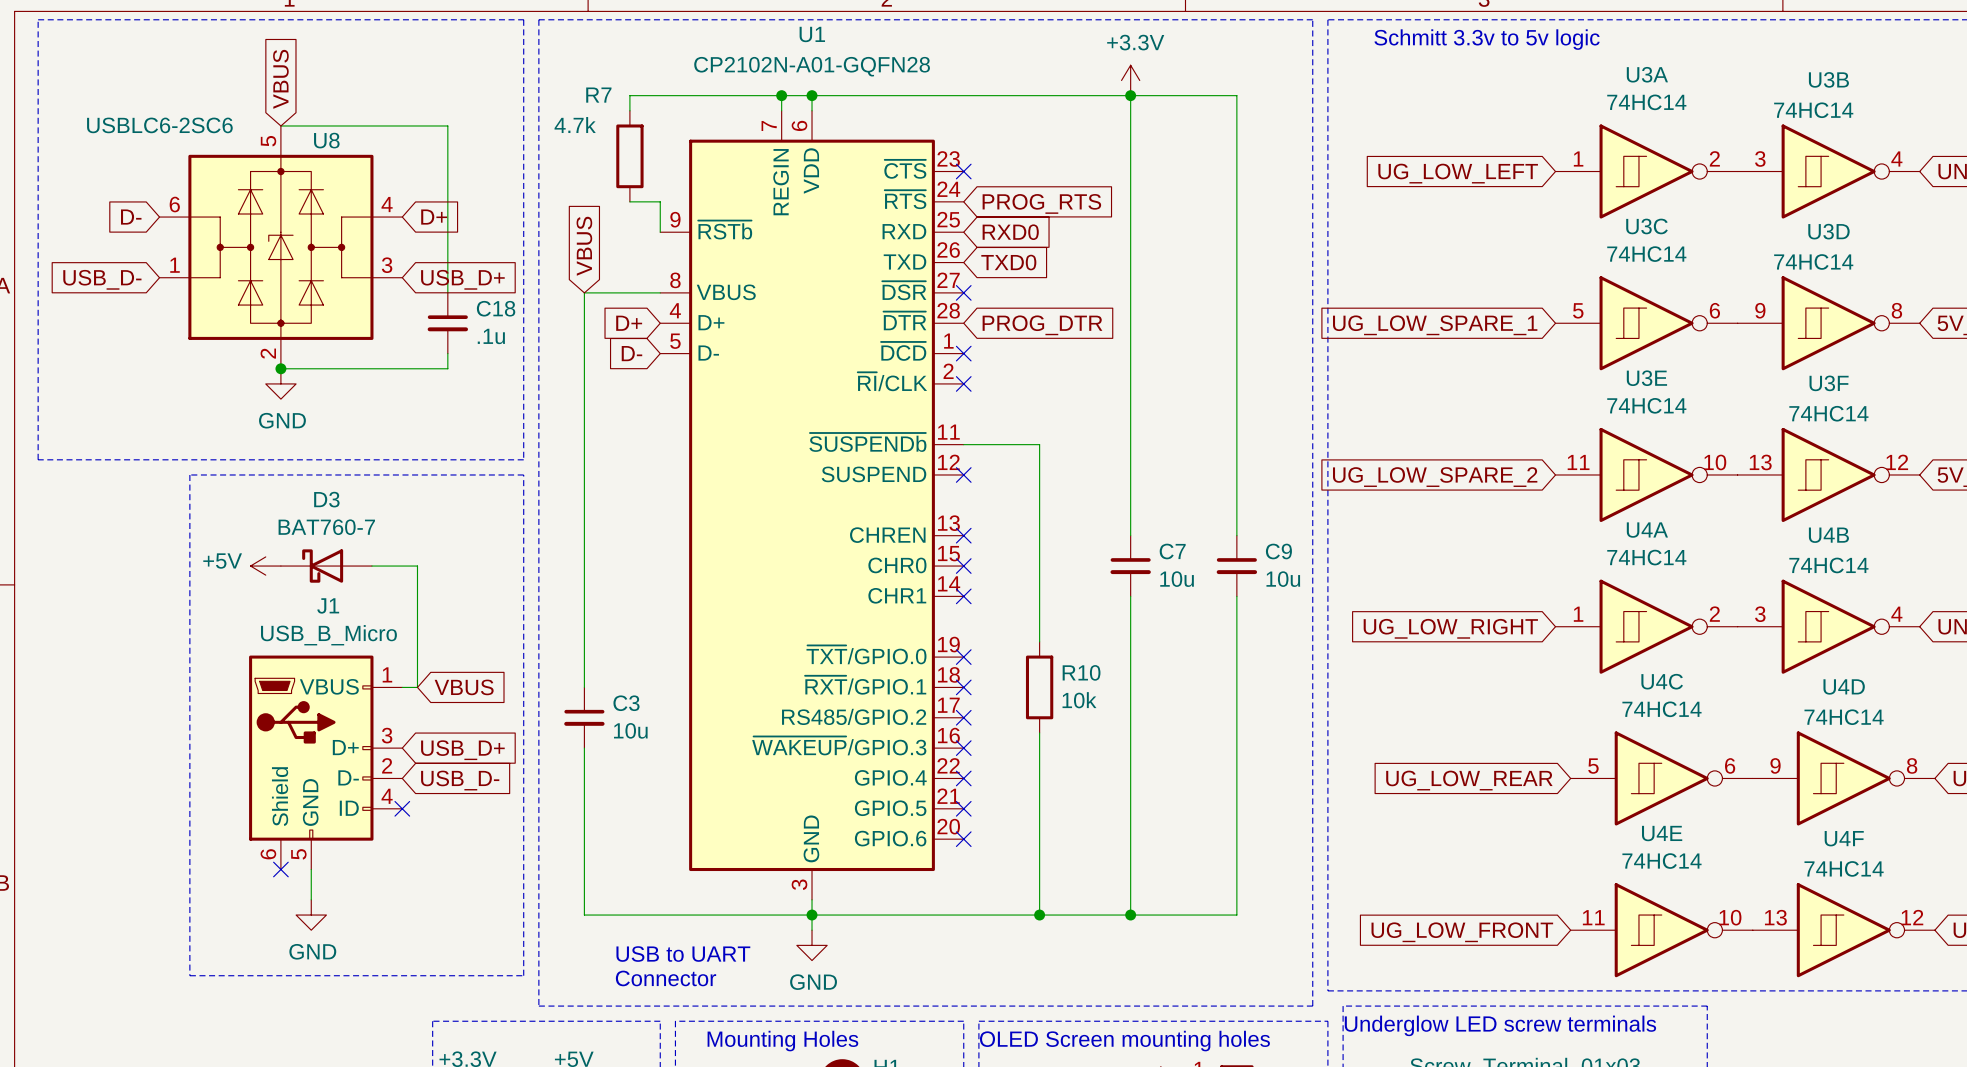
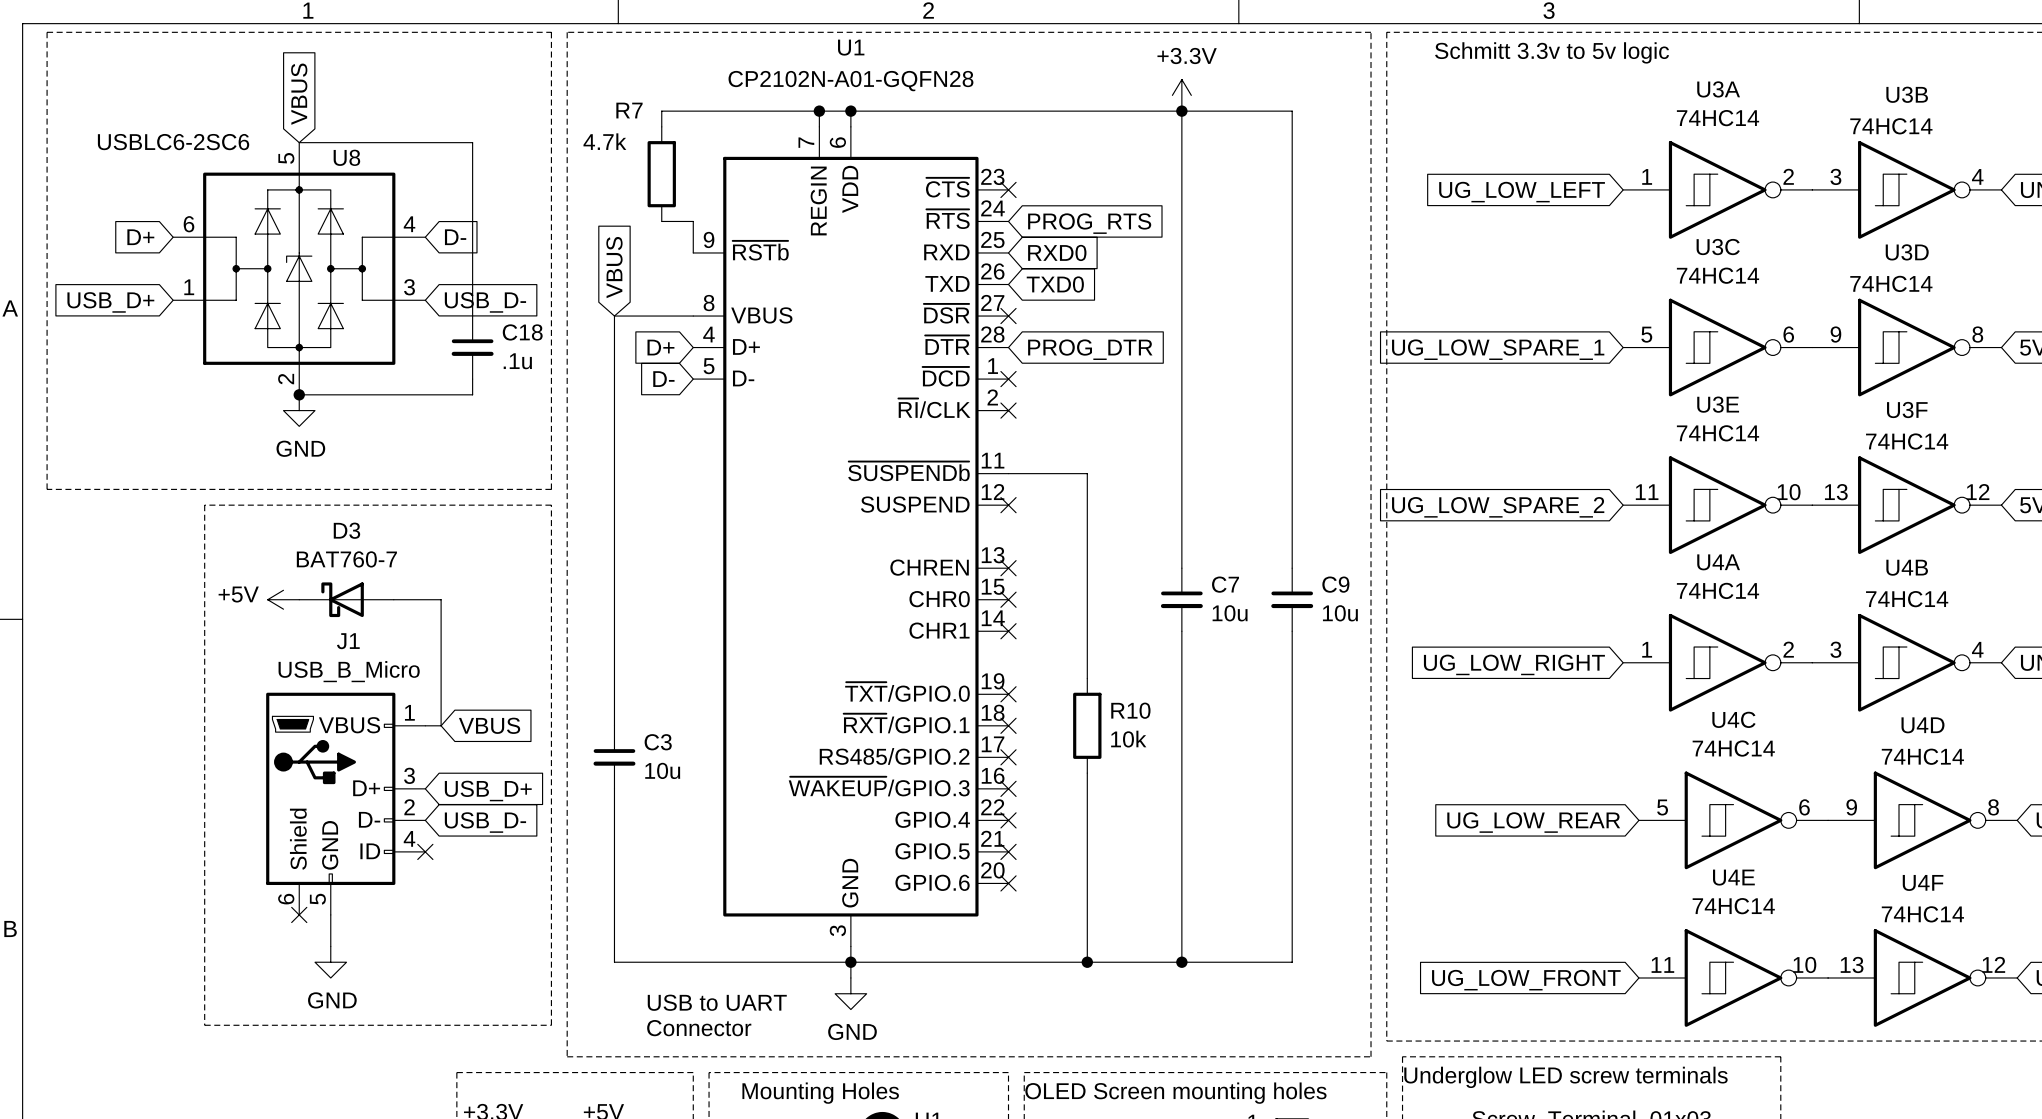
global label: D- (131, 217) -> D+ (140, 237)
global label: D+ (434, 217) -> D- (455, 237)
global label: USB_D- (102, 279) -> USB_D+ (110, 302)
global label: USB_D+ (462, 279) -> USB_D- (485, 302)

